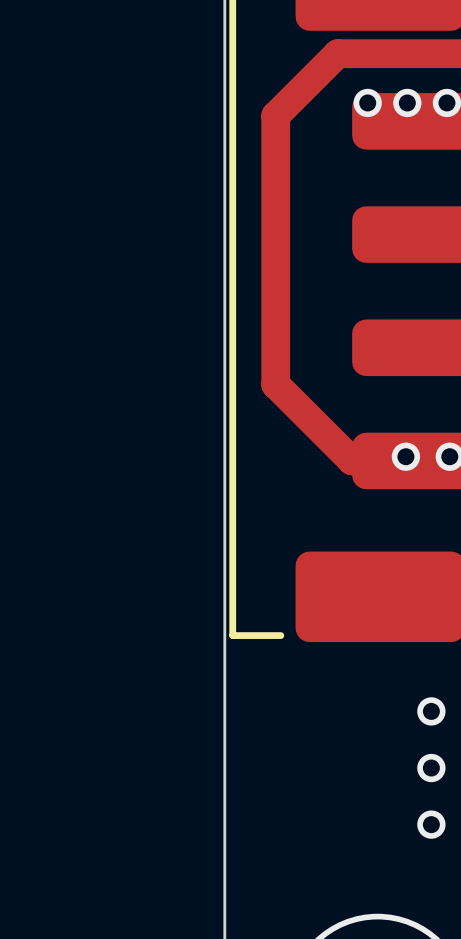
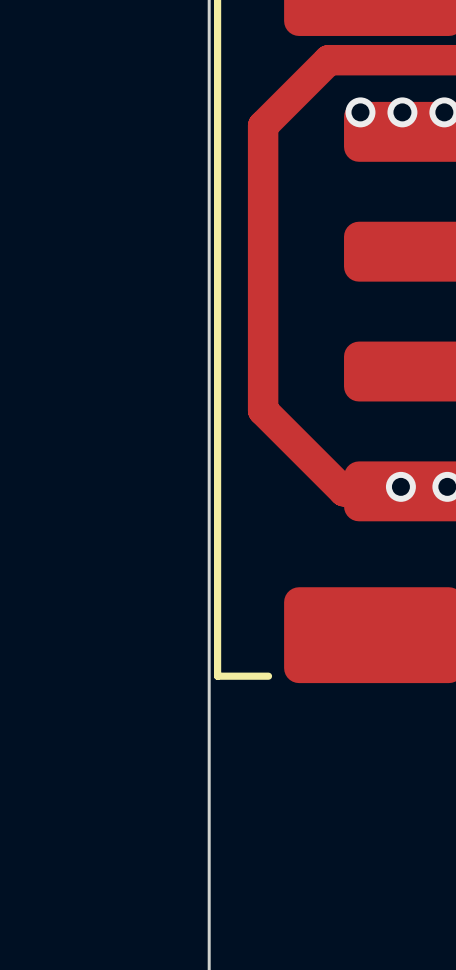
via: (431, 711) -> none
via: (431, 768) -> none
via: (431, 824) -> none

